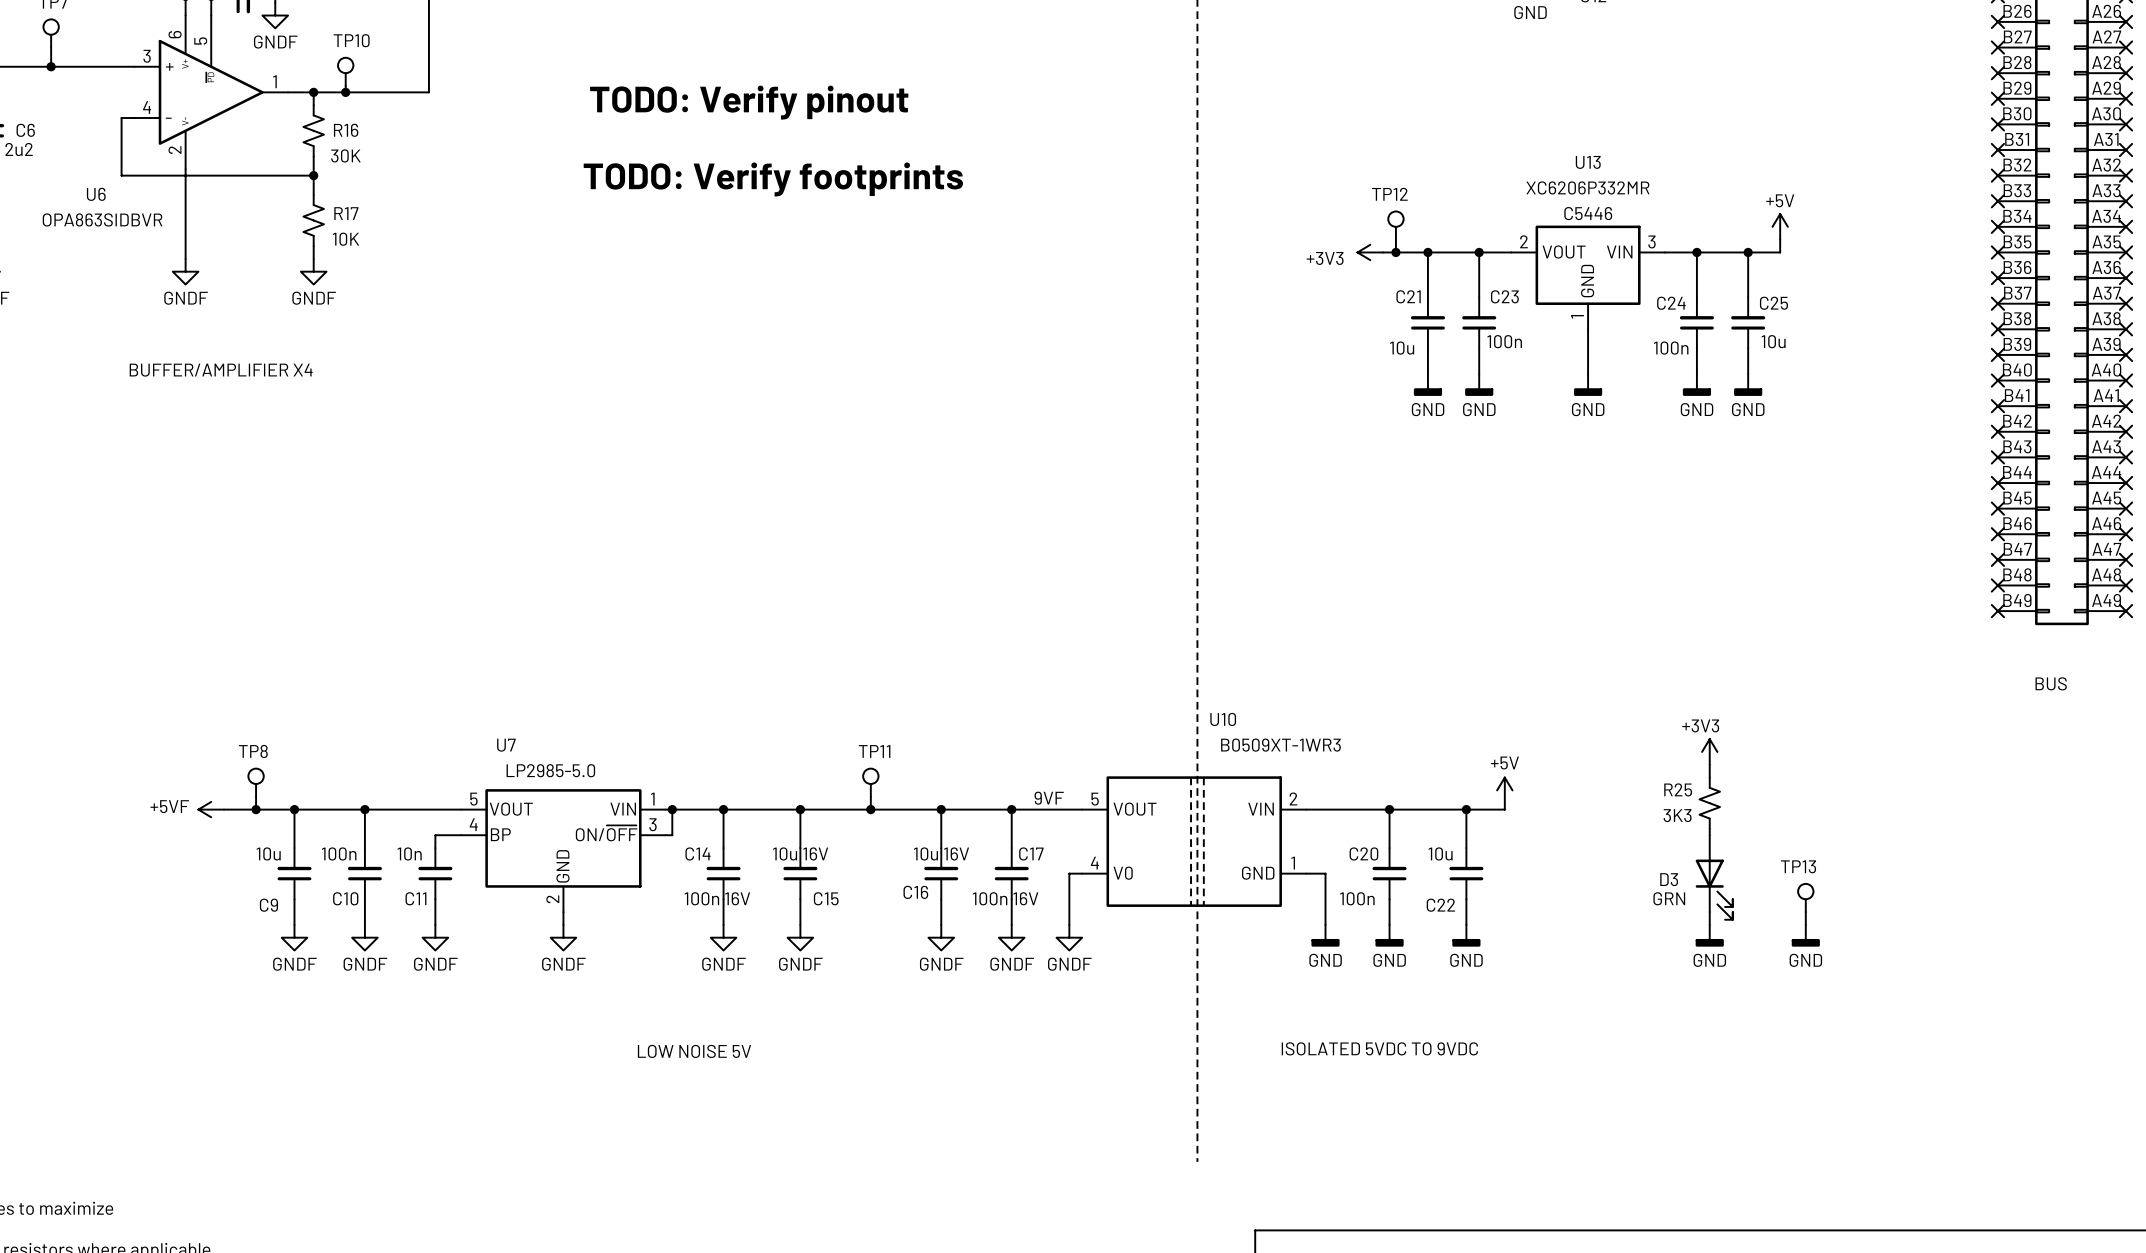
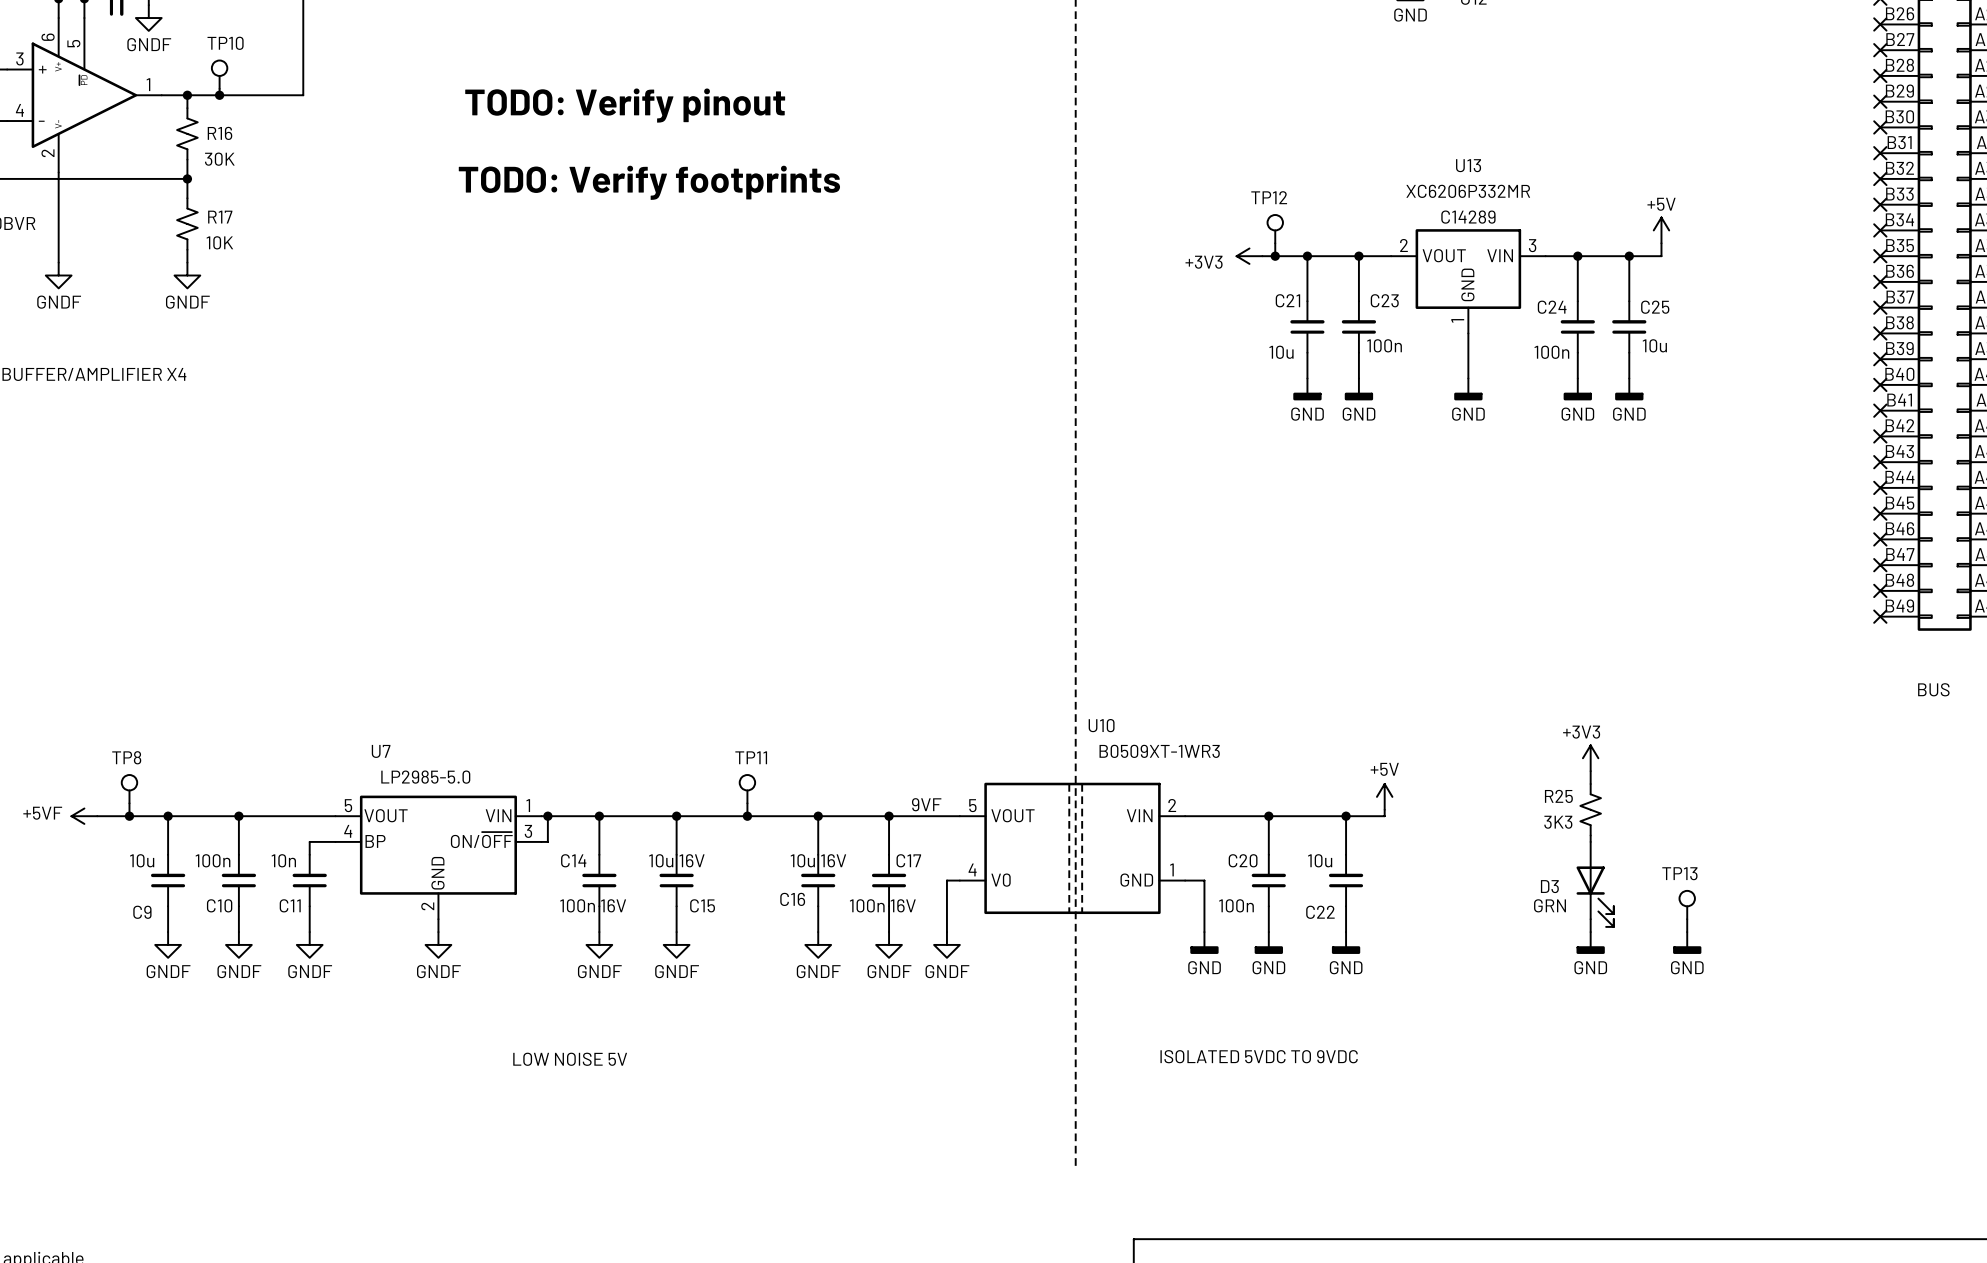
U13 text: C5446 (1588, 213) -> C14289 (1468, 217)

